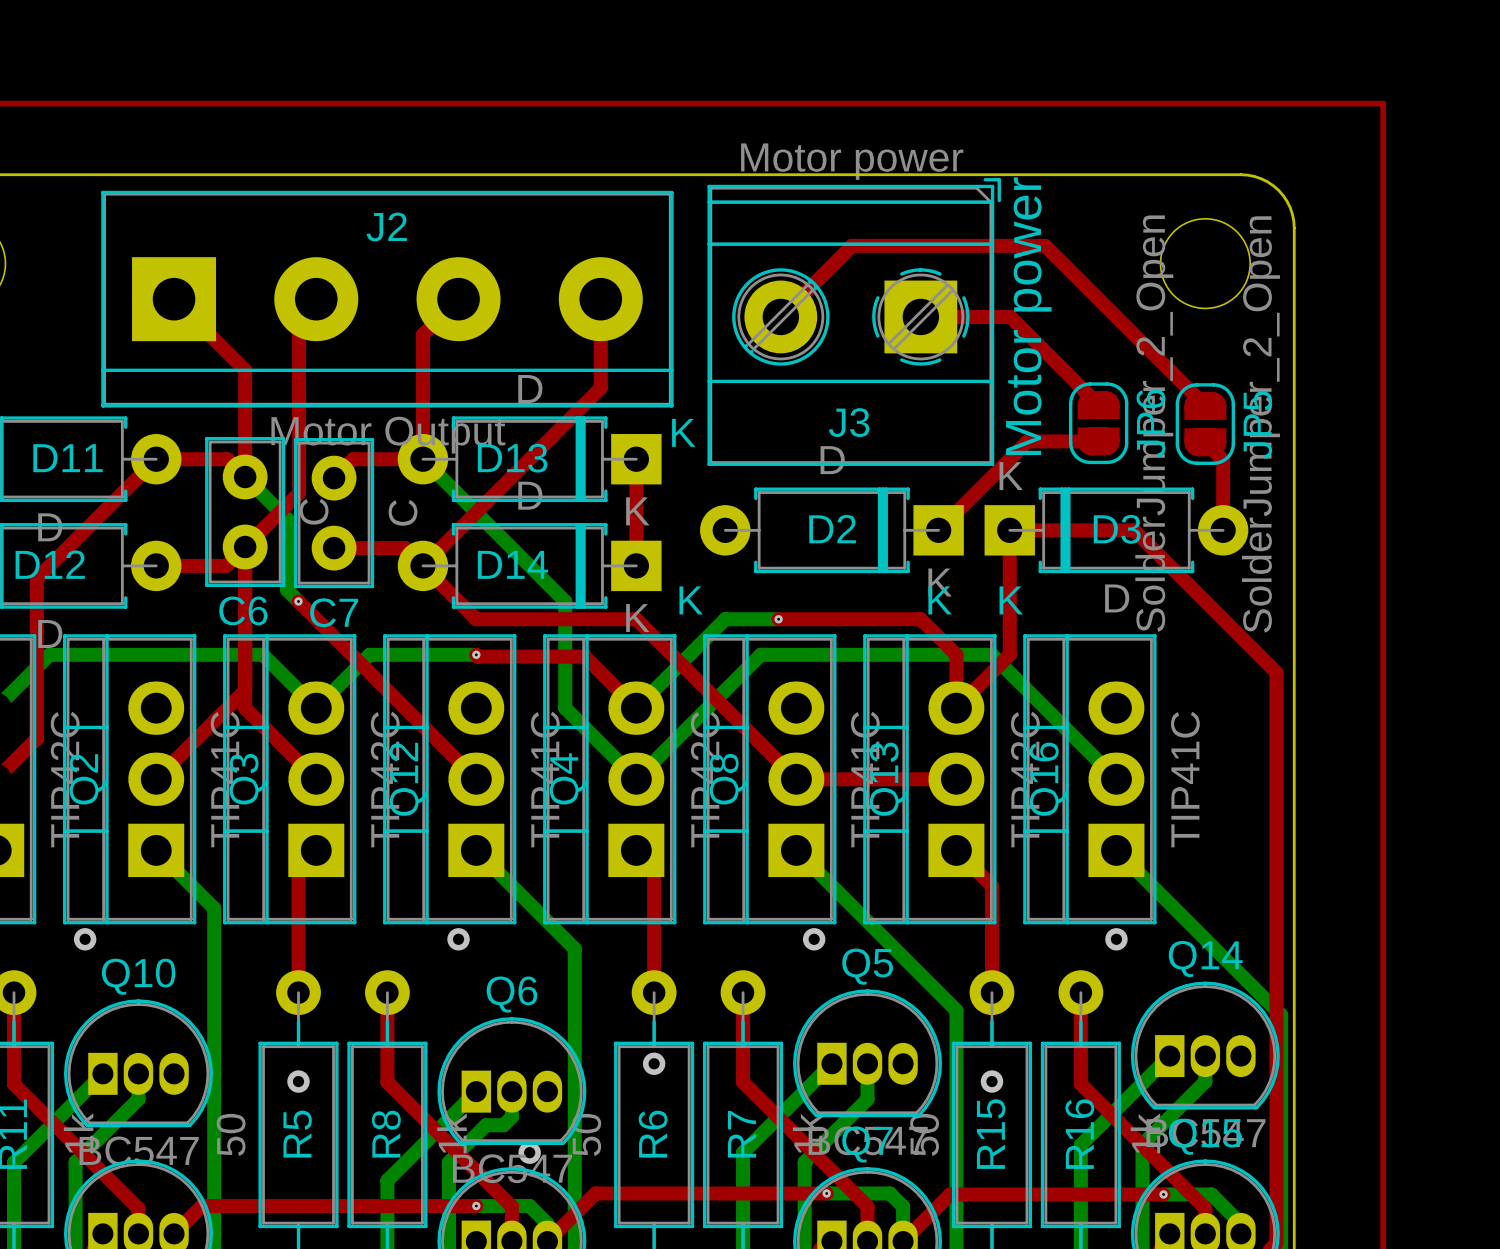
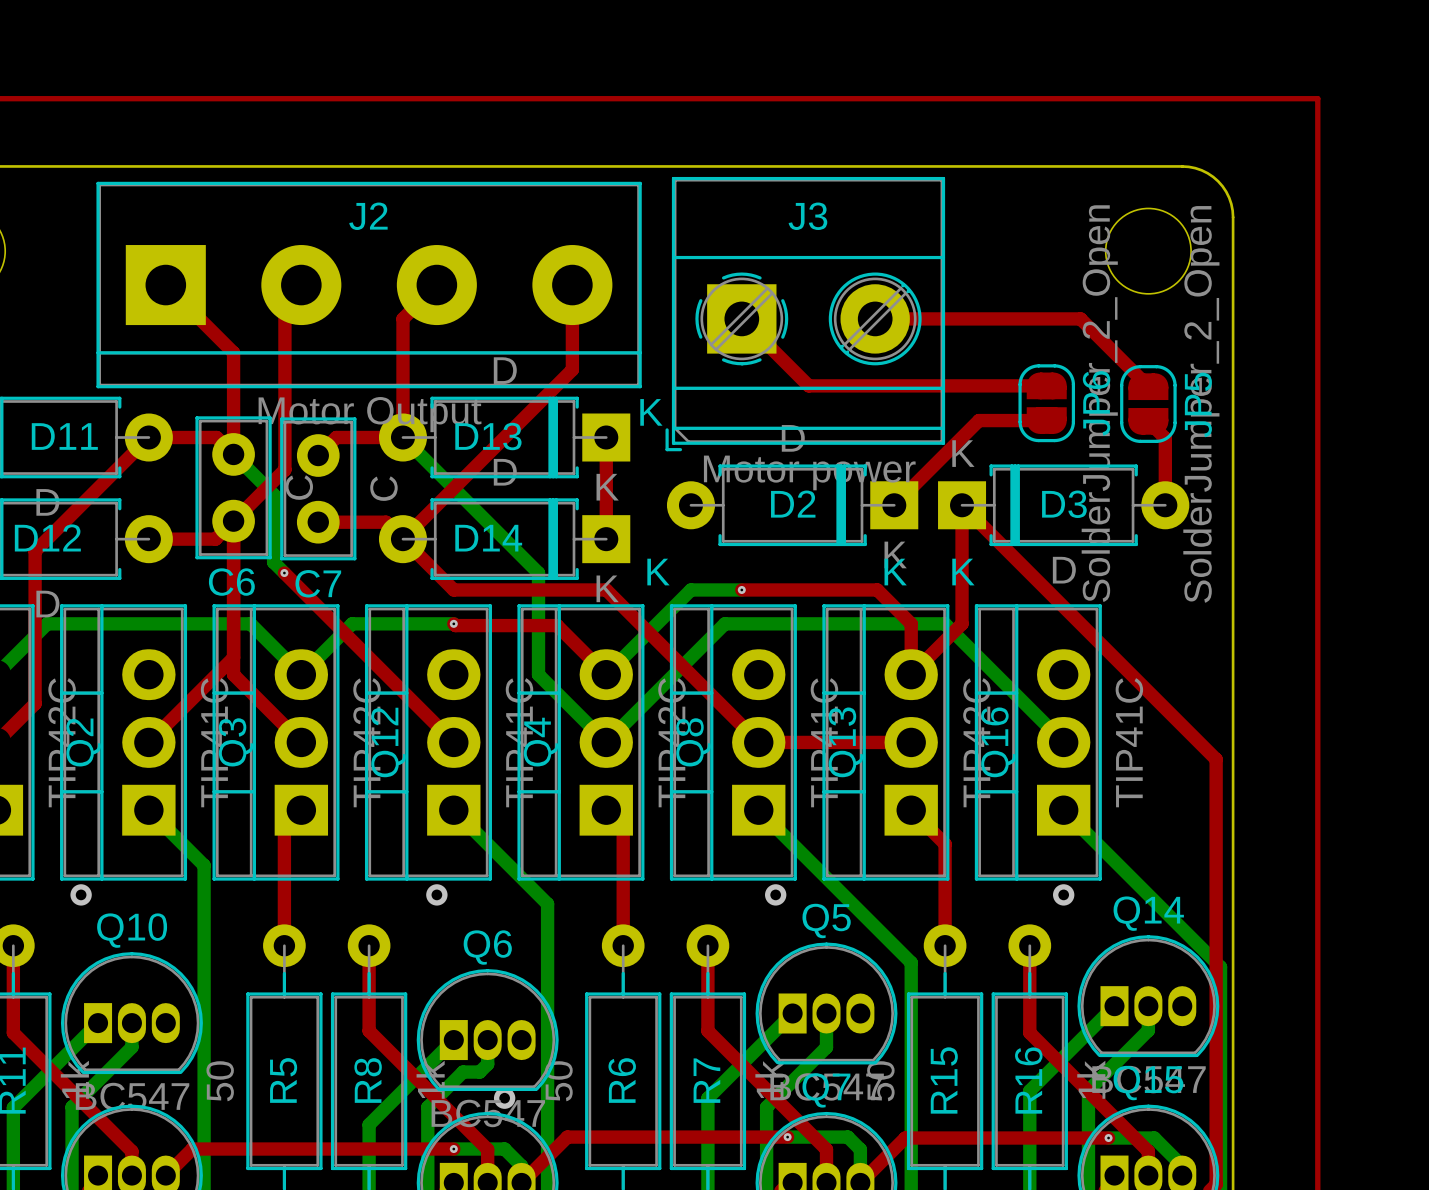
top track: (780, 316) (851, 245) (1045, 245) (1134, 334) -> (875, 318) (1080, 318)
top track: (920, 316) (1010, 316) (1098, 405) -> (741, 318) (808, 385) (1046, 385)
text: Motor power (1028, 316) -> none
J3 rotation: 0° (854, 322) -> 180° (805, 314)
top track: (1009, 530) (1134, 530) (1276, 672) (1276, 797) -> (962, 505) (1216, 759)
via: (654, 1063) -> none
via: (298, 1081) -> none
via: (991, 1081) -> none

